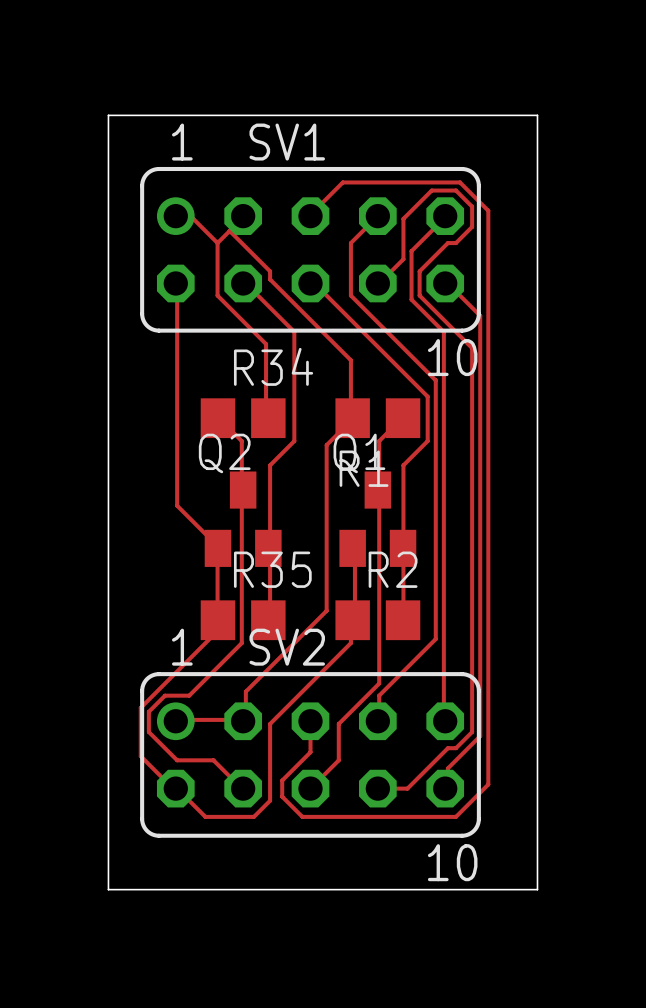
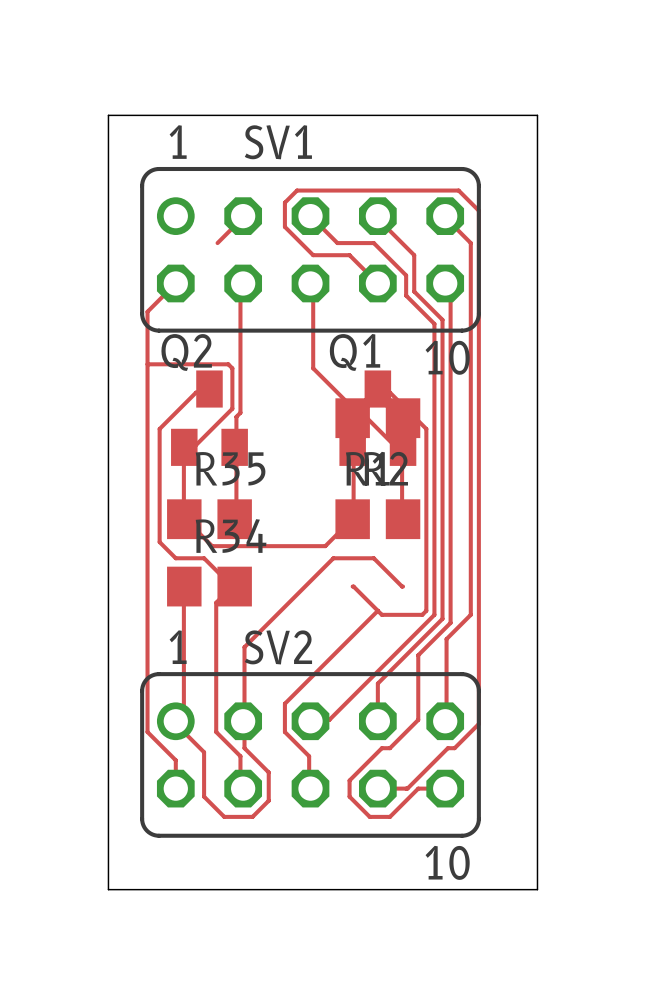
top track: (431, 190) (403, 218) (403, 259) (377, 283) -> (431, 190) (297, 190) (284, 202) (284, 226) (313, 255) (349, 255) (377, 283)
top track: (455, 190) (472, 206) (472, 226) (455, 243) (447, 243) (419, 271) (419, 295) (472, 348) (472, 732) (454, 748) -> (455, 190) (458, 190) (478, 210) (478, 723) (454, 748)
top track: (175, 216) (177, 218) (193, 218) (217, 243) (217, 295) (266, 344) (266, 416) (268, 418) -> none
top track: (310, 216) (342, 182) (460, 182) (488, 210) (488, 784) (455, 816) (389, 816) -> (310, 216) (337, 243) (373, 243) (406, 275) (406, 295) (434, 323) (434, 614) (329, 719) (310, 721)
top track: (377, 216) (350, 243) (350, 295) (435, 380) (435, 639) (379, 695) (377, 721) -> (377, 216) (377, 218) (414, 255) (414, 291) (442, 319) (442, 618) (377, 683) (377, 721)
top track: (445, 216) (411, 251) (411, 299) (443, 331) (445, 721) -> (445, 216) (470, 243) (470, 614) (446, 639) (445, 721)
top track: (229, 230) (270, 271) (270, 279) (350, 360) (350, 416) (352, 418) (326, 445) (326, 610) (245, 691) (245, 719) (175, 721) -> none
top track: (175, 283) (177, 505) (217, 546) (217, 631) (140, 707) (140, 756) (205, 816) (224, 816) -> (175, 283) (147, 311) (147, 732) (175, 760) (175, 788)
top track: (243, 283) (245, 283) (294, 331) (294, 441) (270, 465) (270, 546) (268, 548) (270, 550) (270, 618) (268, 620) -> (243, 283) (240, 283) (240, 412) (236, 416) (236, 445) (234, 447) (236, 449) (236, 517) (234, 519)
top track: (313, 283) (427, 396) (427, 441) (403, 465) (403, 620) -> (313, 283) (313, 368) (361, 416) (365, 416) (394, 445) (402, 445) (403, 519)
top track: (446, 283) (480, 315) (480, 736) (447, 768) (447, 788) (445, 788) -> (446, 283) (450, 287) (450, 622) (418, 655) (418, 719) (389, 748) (381, 748) (349, 780) (349, 796) (369, 816)
top track: none -> (147, 364) (228, 364) (232, 368) (232, 408) (196, 445) (187, 445) (183, 449) (183, 517) (212, 546) (325, 546) (353, 517) (352, 447)
top track: none -> (209, 389) (208, 392) (196, 392) (159, 428) (159, 542) (175, 558) (204, 558) (232, 586)
top track: none -> (377, 389) (377, 392) (389, 392) (426, 428) (426, 610) (422, 614) (381, 614) (352, 586)
top track: (217, 418) (241, 441) (241, 643) (189, 695) (165, 695) (148, 711) (148, 732) (177, 760) (213, 760) (241, 788) -> (232, 586) (216, 602) (216, 732) (240, 756) (241, 788)
R34 position: (243, 418) -> (209, 586)
top track: (403, 418) (379, 441) (379, 683) (338, 723) (338, 760) (310, 788) -> (377, 610) (284, 703) (284, 732) (309, 756) (310, 788)
Q2 position: (243, 519) -> (209, 418)
Q1 position: (377, 519) -> (377, 418)
top track: (352, 548) (354, 550) (354, 618) (350, 622) (350, 643) (270, 723) (270, 800) (252, 816) -> (403, 586) (373, 558) (333, 558) (244, 647) (244, 748) (268, 772) (268, 800) (252, 816)
top track: none -> (183, 586) (183, 711) (175, 719) (175, 723) (204, 752) (204, 796) (224, 816)
R35 position: (243, 620) -> (209, 519)
R2 position: (377, 620) -> (377, 519)
top track: (310, 721) (310, 752) (282, 780) (282, 796) (302, 816) (369, 816) -> none
top track: none -> (445, 788) (418, 788) (389, 816)

